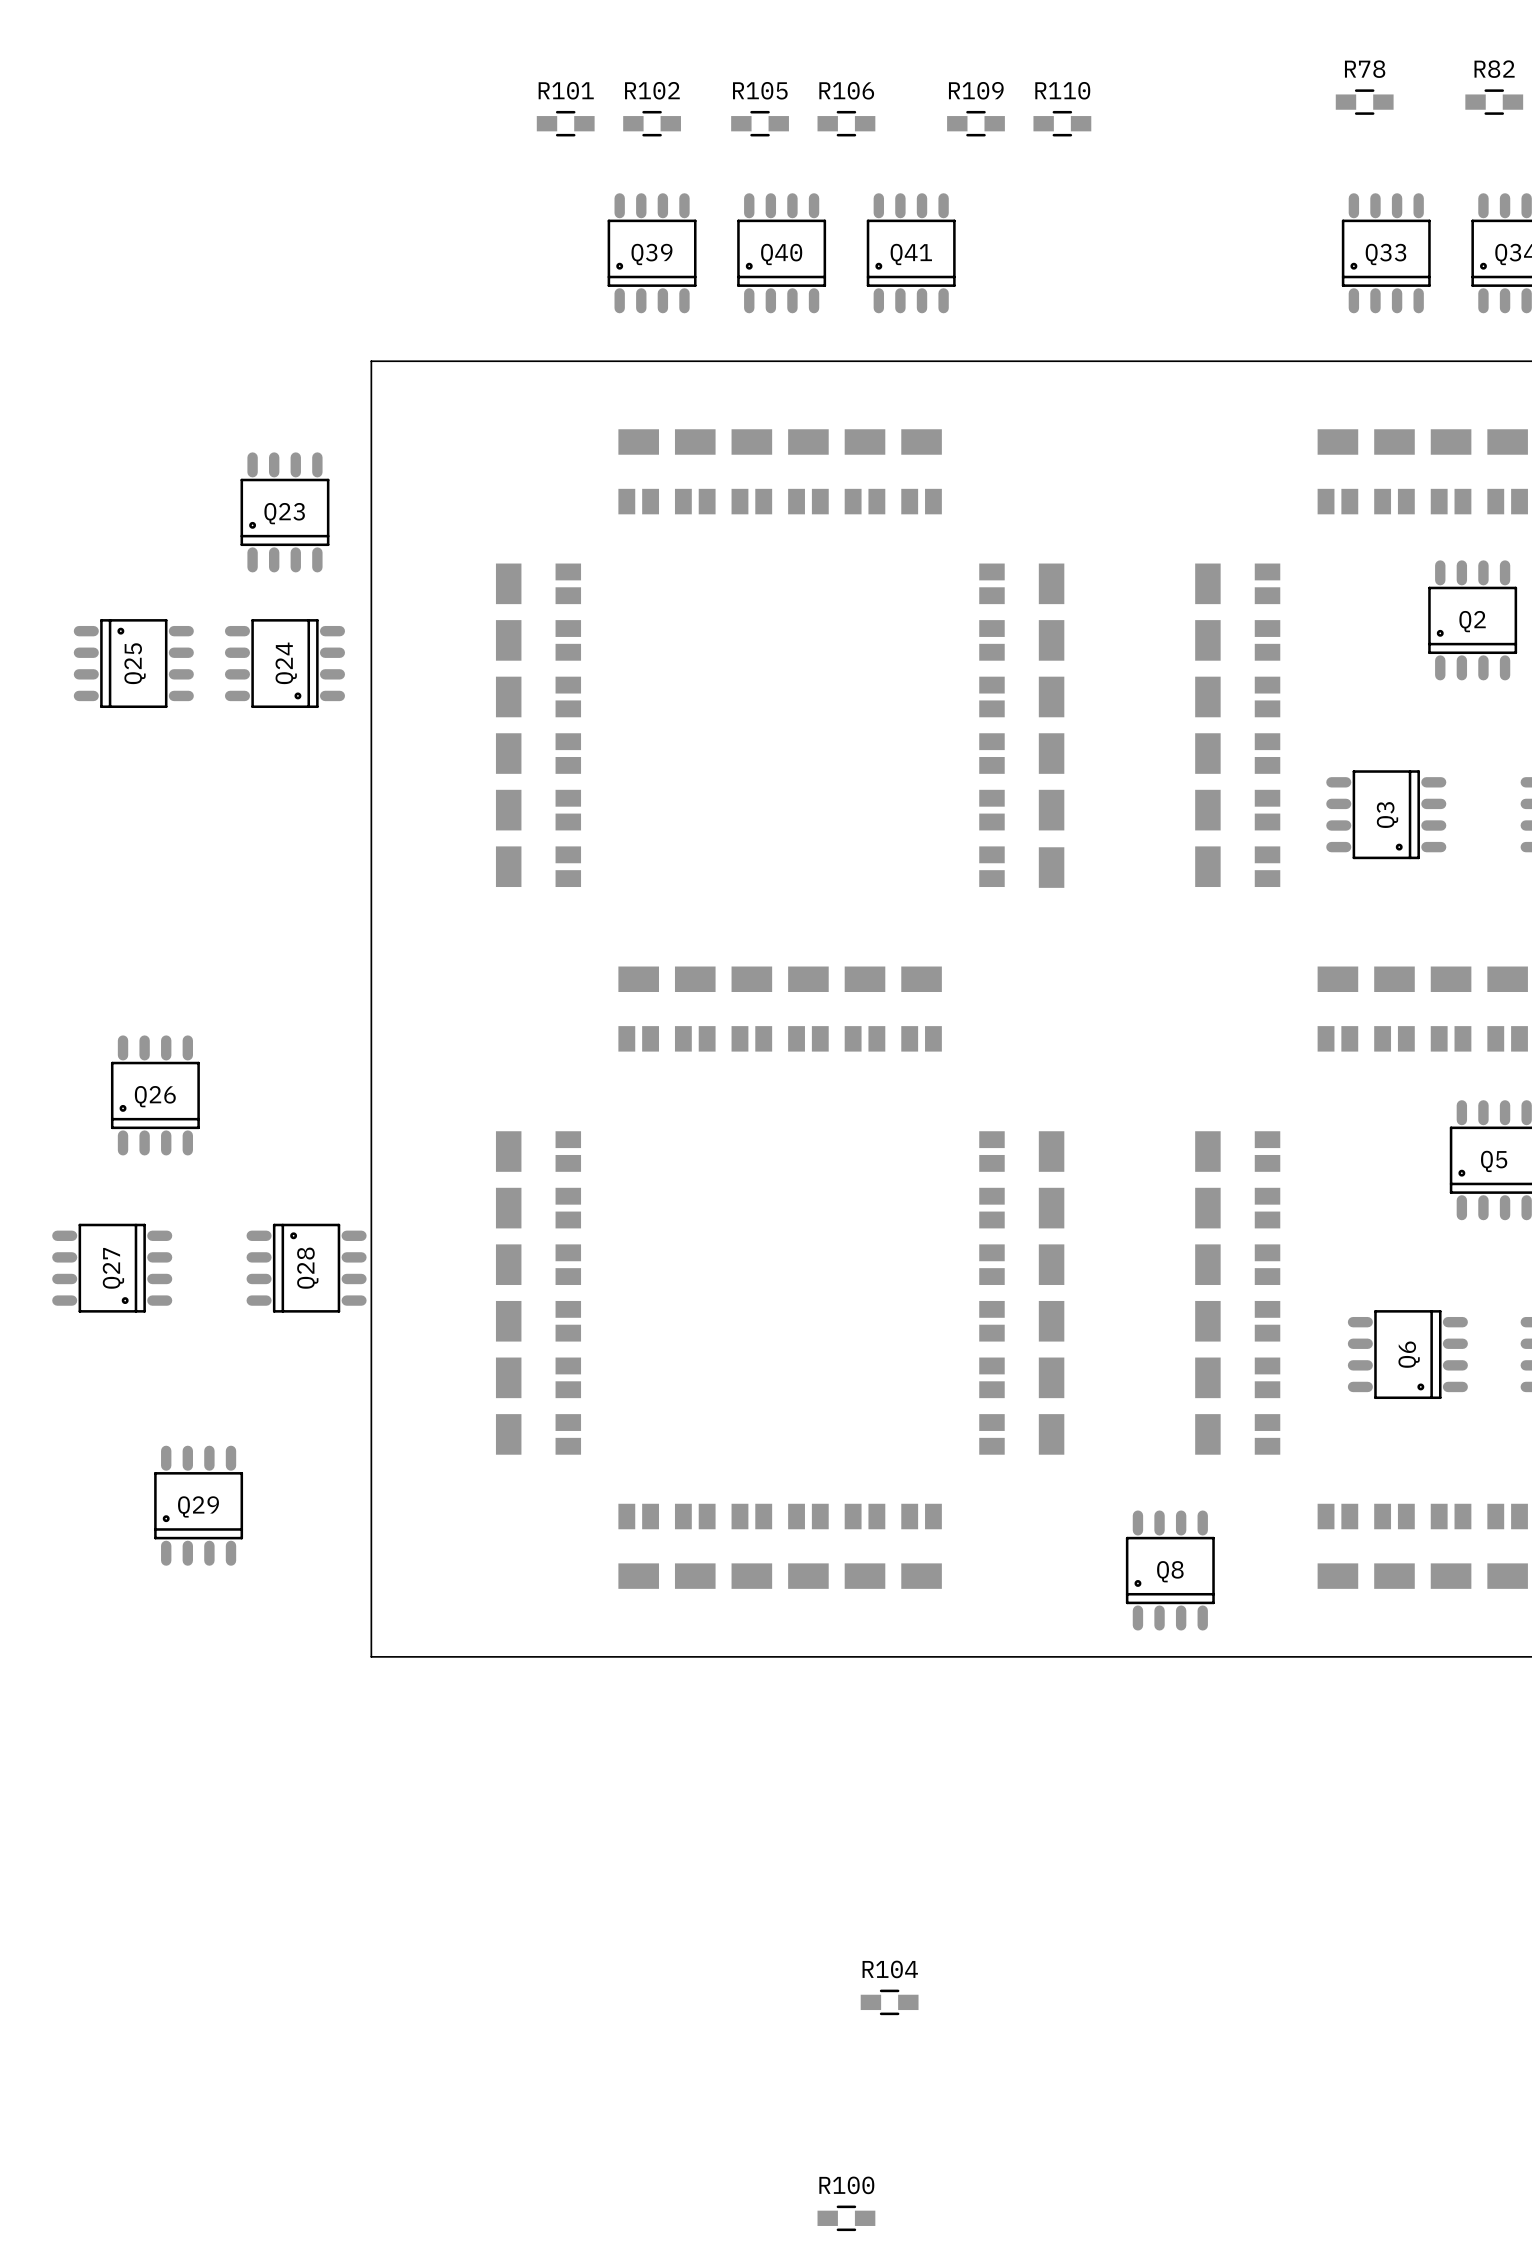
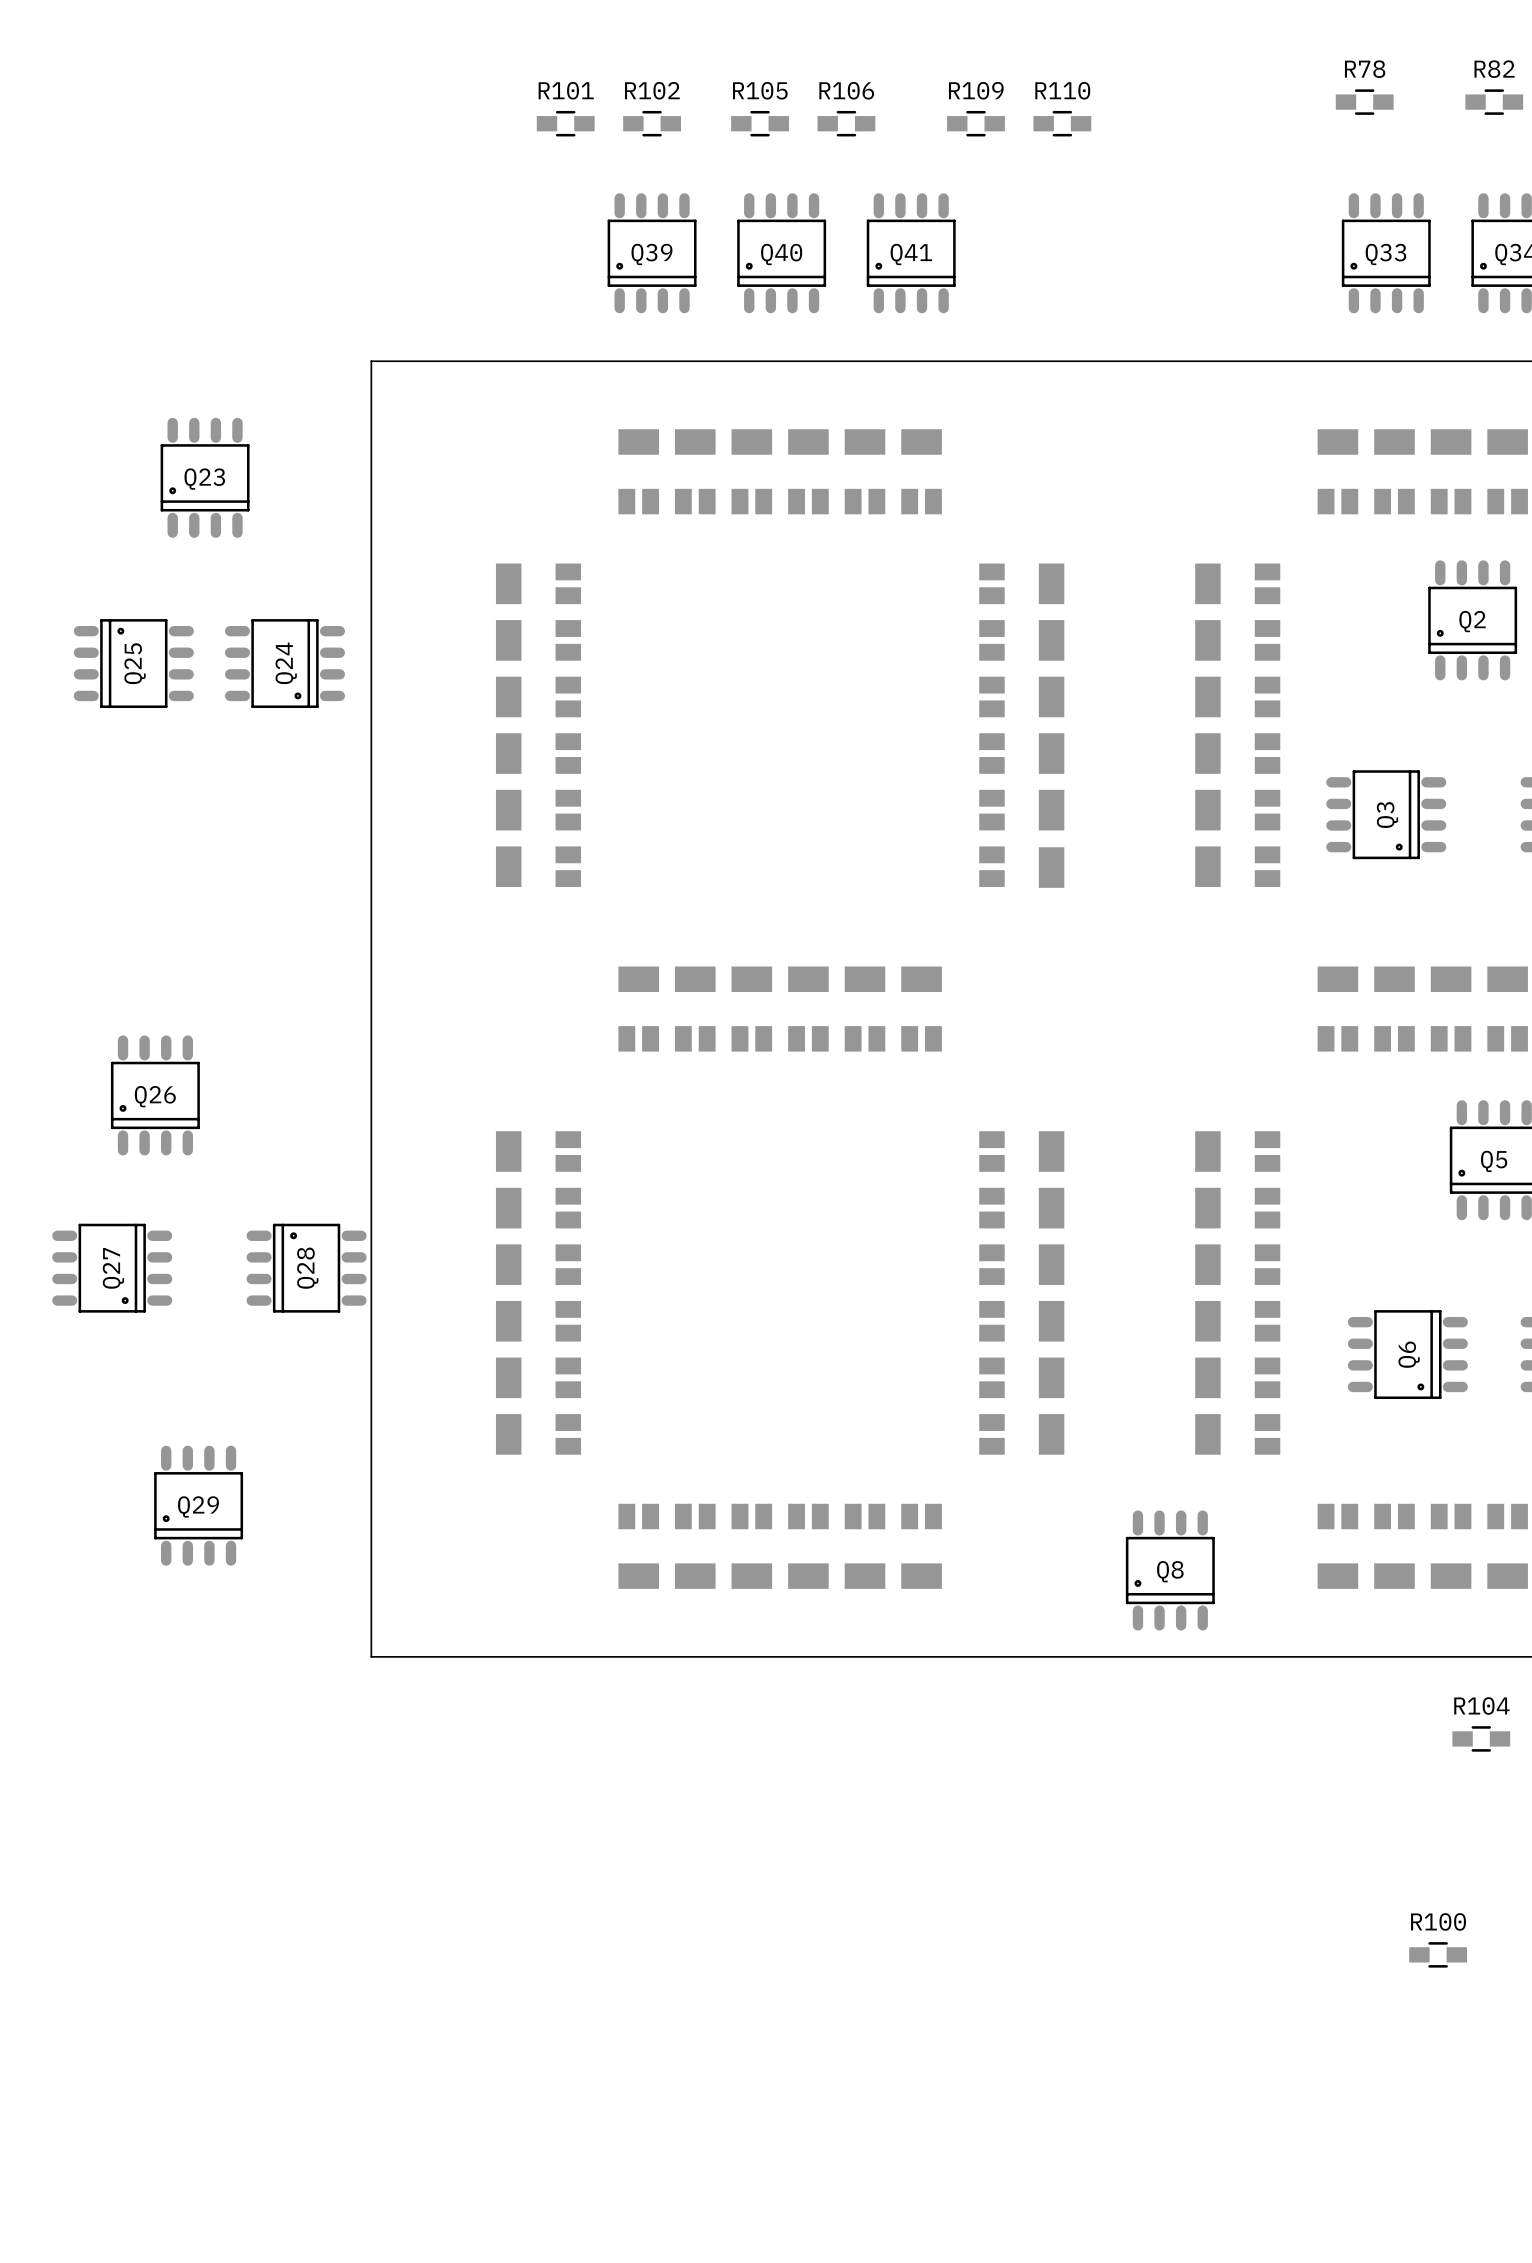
Q23 position: (284, 512) -> (205, 477)
R104 position: (889, 2002) -> (1481, 1738)
R100 position: (846, 2218) -> (1438, 1954)

